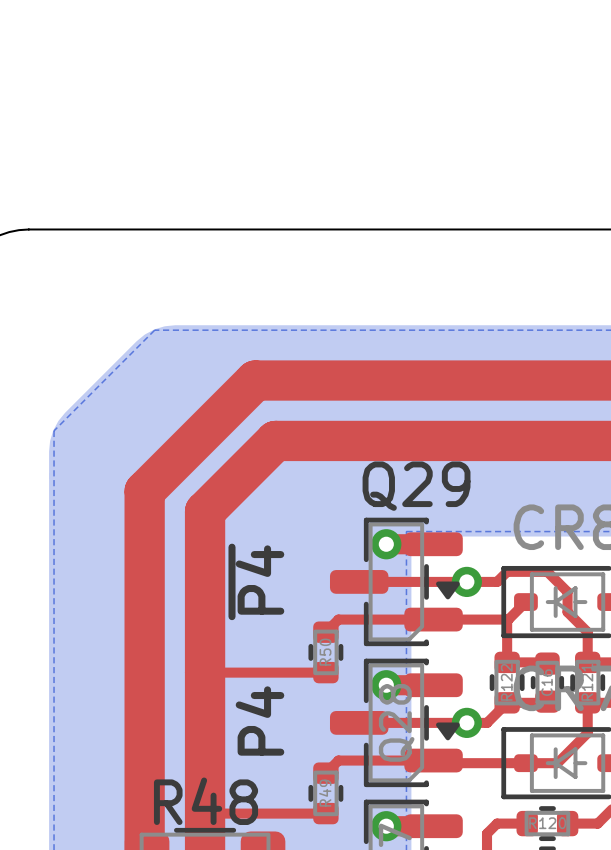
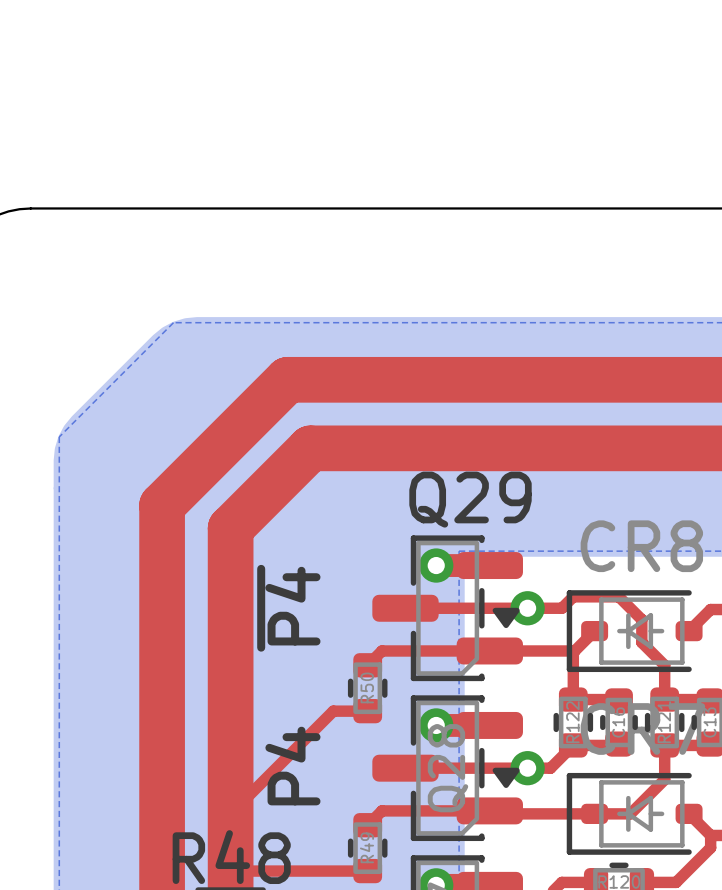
top track: (205, 672) (295, 672) -> (230, 813) (333, 711)

